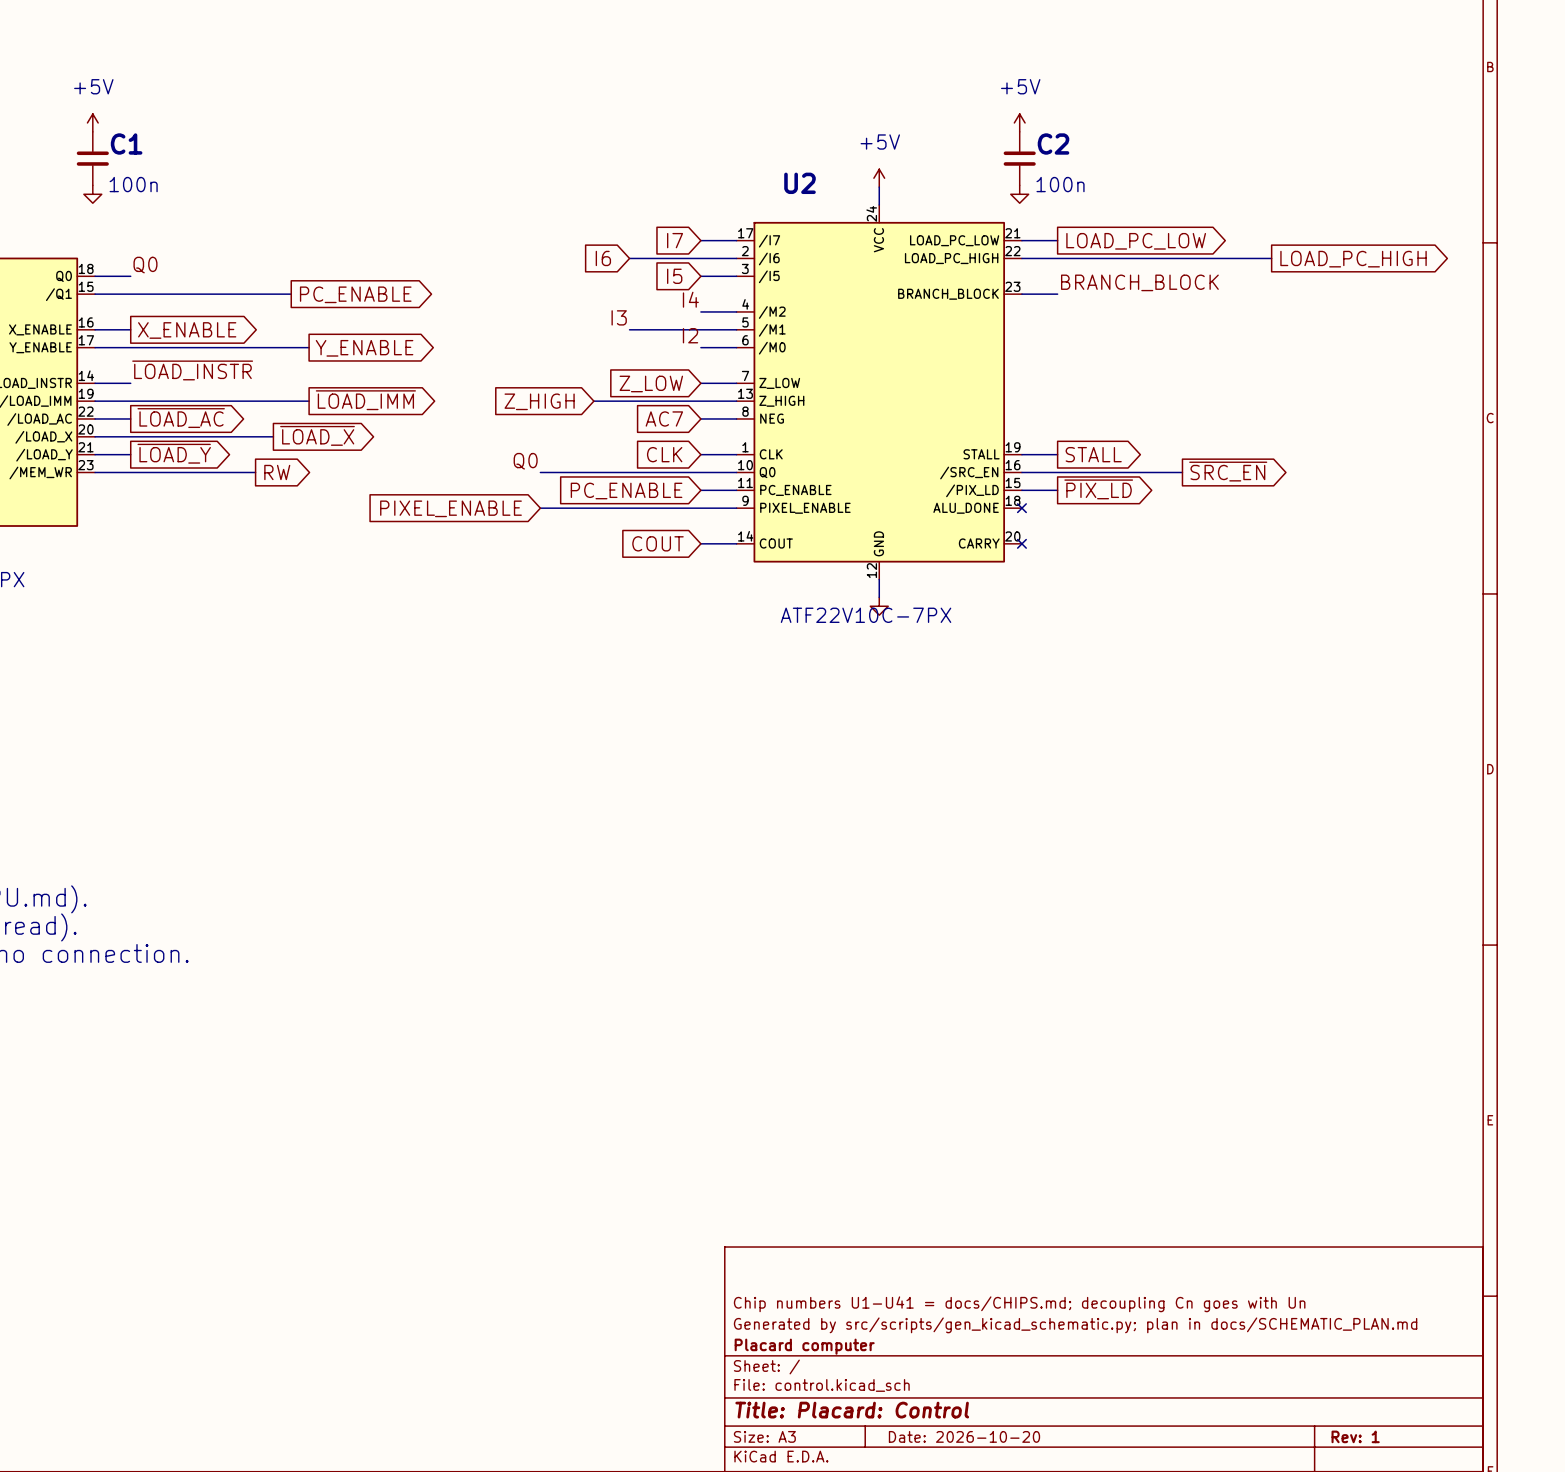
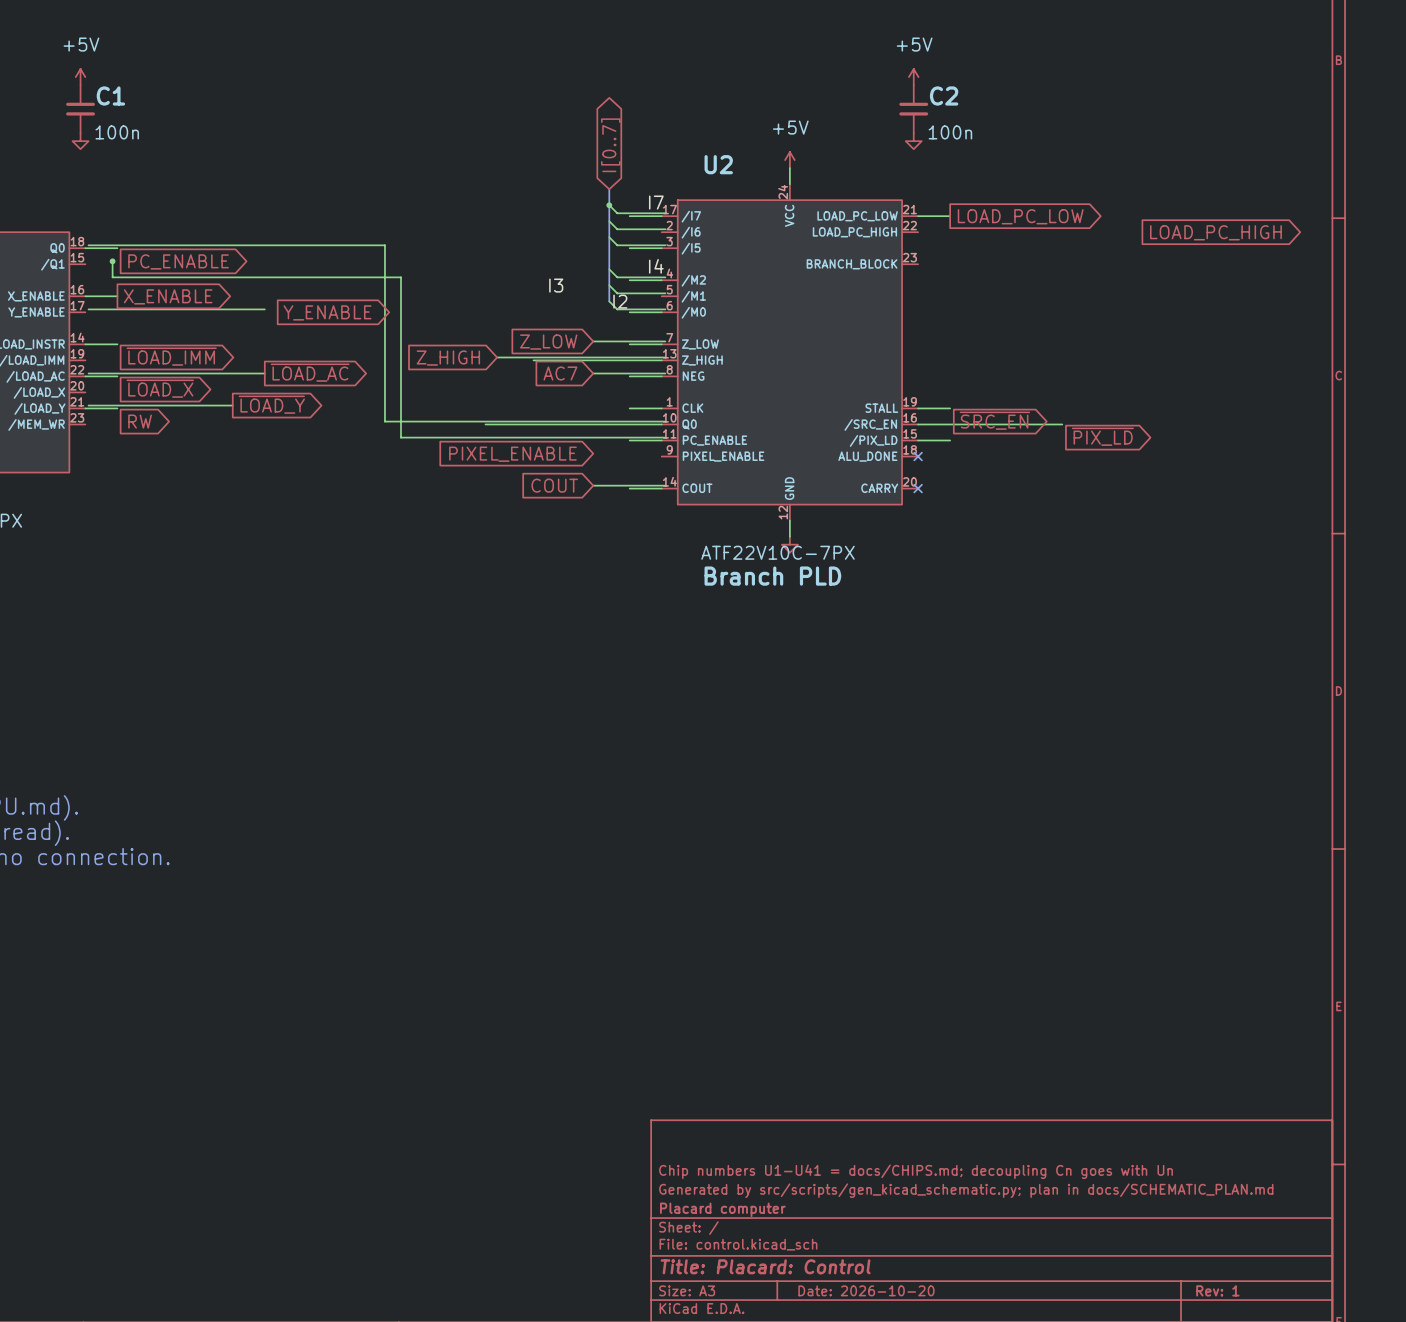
power symbol position: +5V (92, 122) -> +5V (80, 77)
power symbol position: +5V (1019, 122) -> +5V (913, 77)
C1 position: (92, 158) -> (80, 109)
C2 position: (1019, 158) -> (913, 109)
global label: none -> I[0..7] (610, 145)
power symbol position: (92, 194) -> (80, 141)
power symbol position: (1019, 194) -> (913, 141)
bus: none -> (609, 189) (609, 301)
label: none -> I7 (656, 202)
wire: none -> (609, 205) (617, 213) (665, 213)
junction: none -> (609, 205)
global label: I7 (675, 240) -> none
wire: none -> (609, 221) (617, 229) (665, 229)
global label: I6 (603, 258) -> none
wire: (629, 258) (736, 258) -> none
wire: (1021, 258) (1271, 258) -> none
wire: none -> (609, 237) (617, 245) (665, 245)
label: Q0 (145, 265) -> none
wire: none -> (88, 245) (384, 245) (384, 421) (665, 421)
global label: I5 (674, 276) -> none
label: BRANCH_BLOCK (1139, 282) -> none
wire: none -> (112, 261) (112, 277) (401, 277) (401, 437) (665, 437)
junction: none -> (112, 261)
wire: (95, 294) (291, 294) -> (88, 309) (264, 309)
global label position: PC_ENABLE (355, 294) -> PC_ENABLE (178, 261)
wire: (1021, 294) (1057, 294) -> none
wire: none -> (609, 269) (617, 277) (665, 277)
label position: I4 (690, 299) -> I4 (656, 266)
wire: none -> (609, 285) (617, 293) (665, 293)
wire: (629, 329) (736, 329) -> none
wire: none -> (609, 301) (617, 309) (665, 309)
wire: (95, 347) (309, 347) -> none
label: ~{LOAD_INSTR} (192, 370) -> none
wire: none -> (593, 341) (665, 341)
global label position: Z_LOW (651, 383) -> Z_LOW (548, 342)
wire: none -> (497, 357) (665, 357)
global label position: ~{LOAD_IMM} (365, 400) -> ~{LOAD_IMM} (171, 356)
wire: (95, 401) (309, 401) -> none
global label position: Z_HIGH (539, 401) -> Z_HIGH (448, 358)
wire: none -> (88, 373) (264, 373)
wire: none -> (593, 373) (665, 373)
global label position: ~{LOAD_AC} (181, 418) -> ~{LOAD_AC} (310, 372)
global label position: AC7 (664, 418) -> AC7 (560, 373)
global label position: ~{LOAD_X} (317, 435) -> ~{LOAD_X} (160, 388)
wire: (95, 436) (273, 436) -> none
global label position: ~{LOAD_Y} (174, 453) -> ~{LOAD_Y} (271, 404)
global label: CLK (664, 454) -> none
global label: STALL (1093, 454) -> none
label: Q0 (525, 461) -> none
global label position: ~{SRC_EN} (1228, 471) -> ~{SRC_EN} (994, 420)
wire: (95, 472) (255, 472) -> (88, 405) (232, 405)
global label position: RW (277, 472) -> RW (140, 421)
global label position: ~{PIX_LD} (1098, 489) -> ~{PIX_LD} (1102, 436)
global label: PC_ENABLE (626, 491) -> none
global label position: PIXEL_ENABLE (450, 508) -> PIXEL_ENABLE (512, 454)
wire: (540, 508) (736, 508) -> none
wire: none -> (593, 485) (665, 485)
global label position: COUT (657, 543) -> COUT (554, 485)
U2 text: none -> Branch PLD (772, 576)

